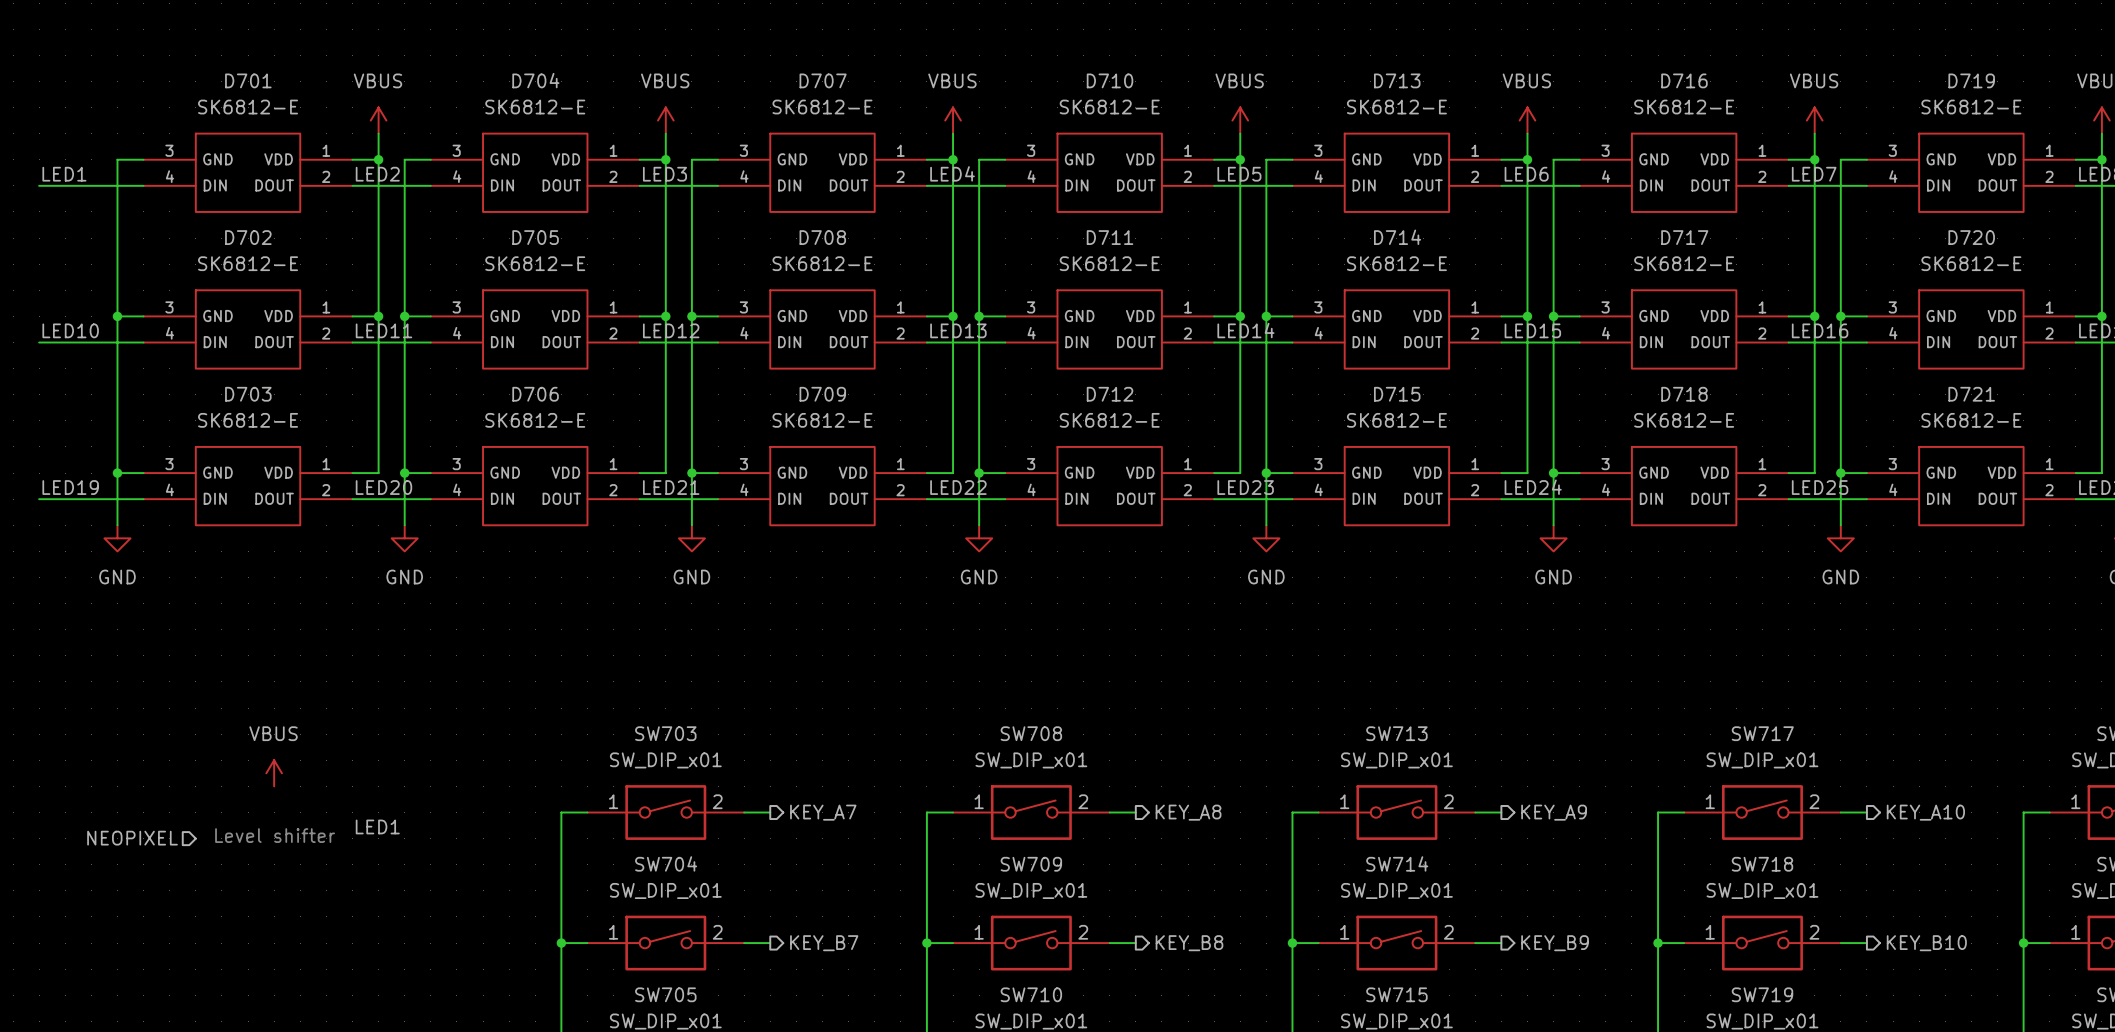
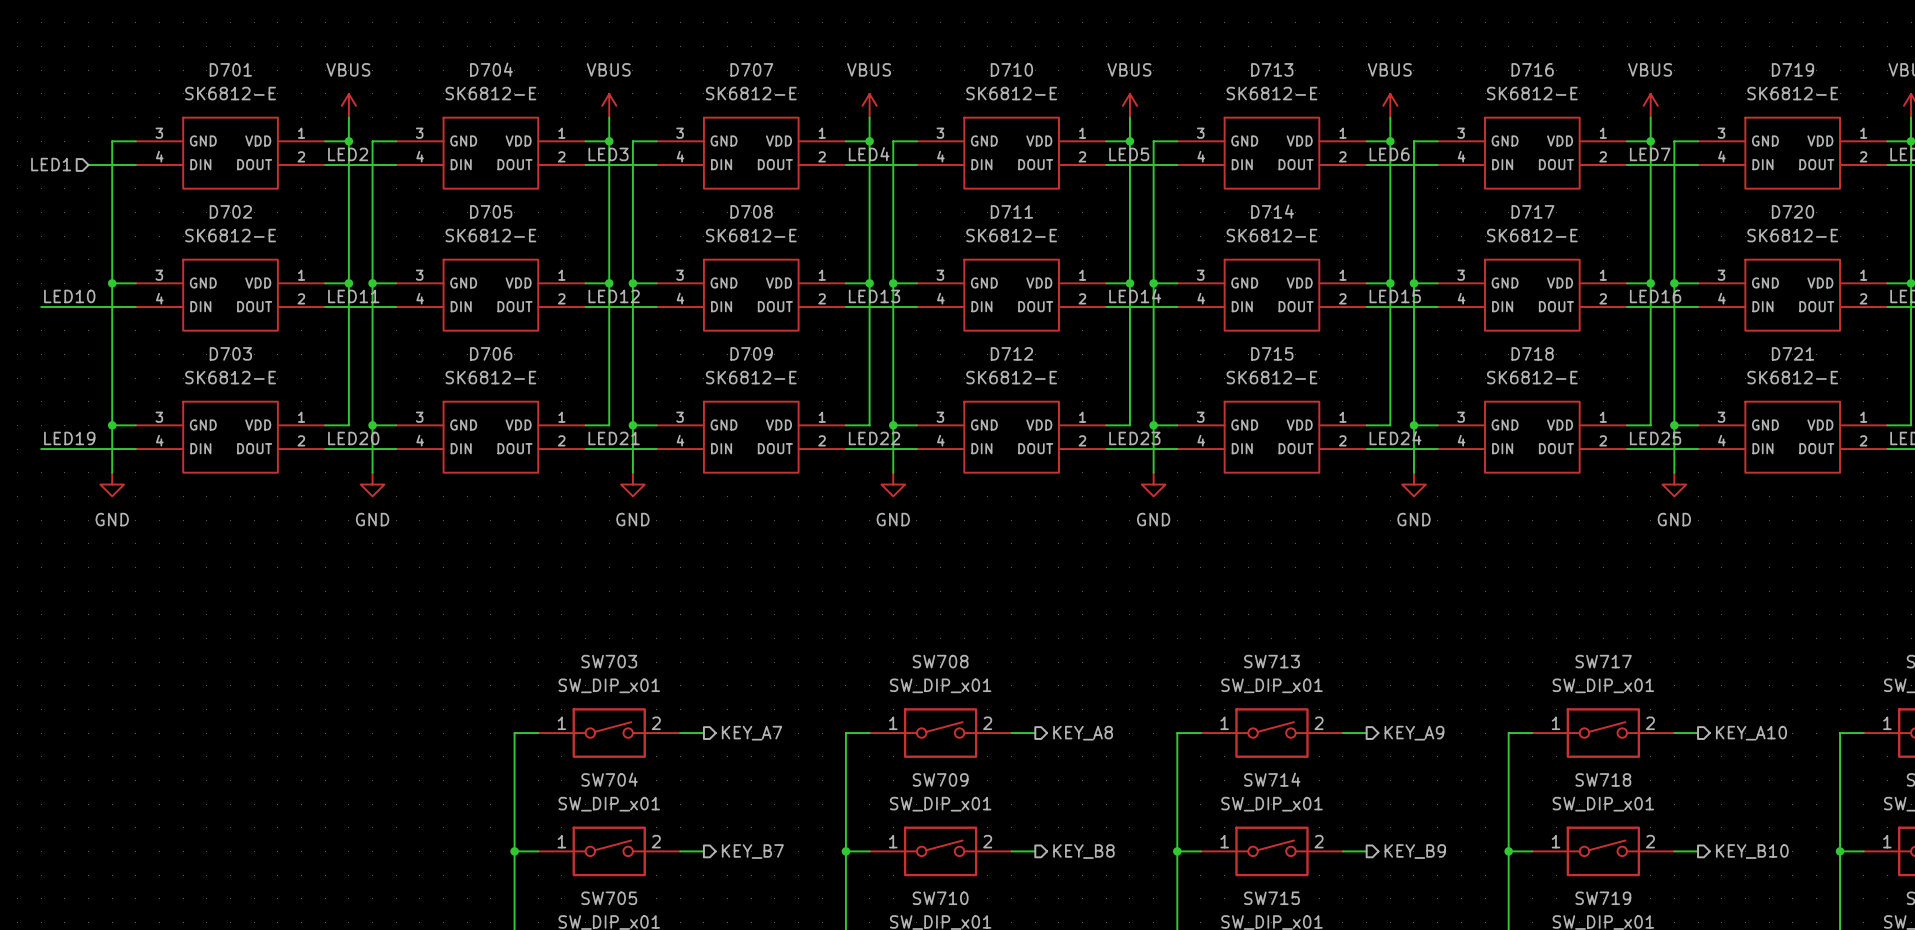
label: LED1 (64, 174) -> none
wire: (39, 185) (91, 185) -> none
hierarchical label: none -> LED1 (51, 164)
power symbol: VBUS (274, 773) -> none
label: LED1 (377, 826) -> none
text: Level shifter (275, 835) -> none
hierarchical label: NEOPIXEL (132, 838) -> none

